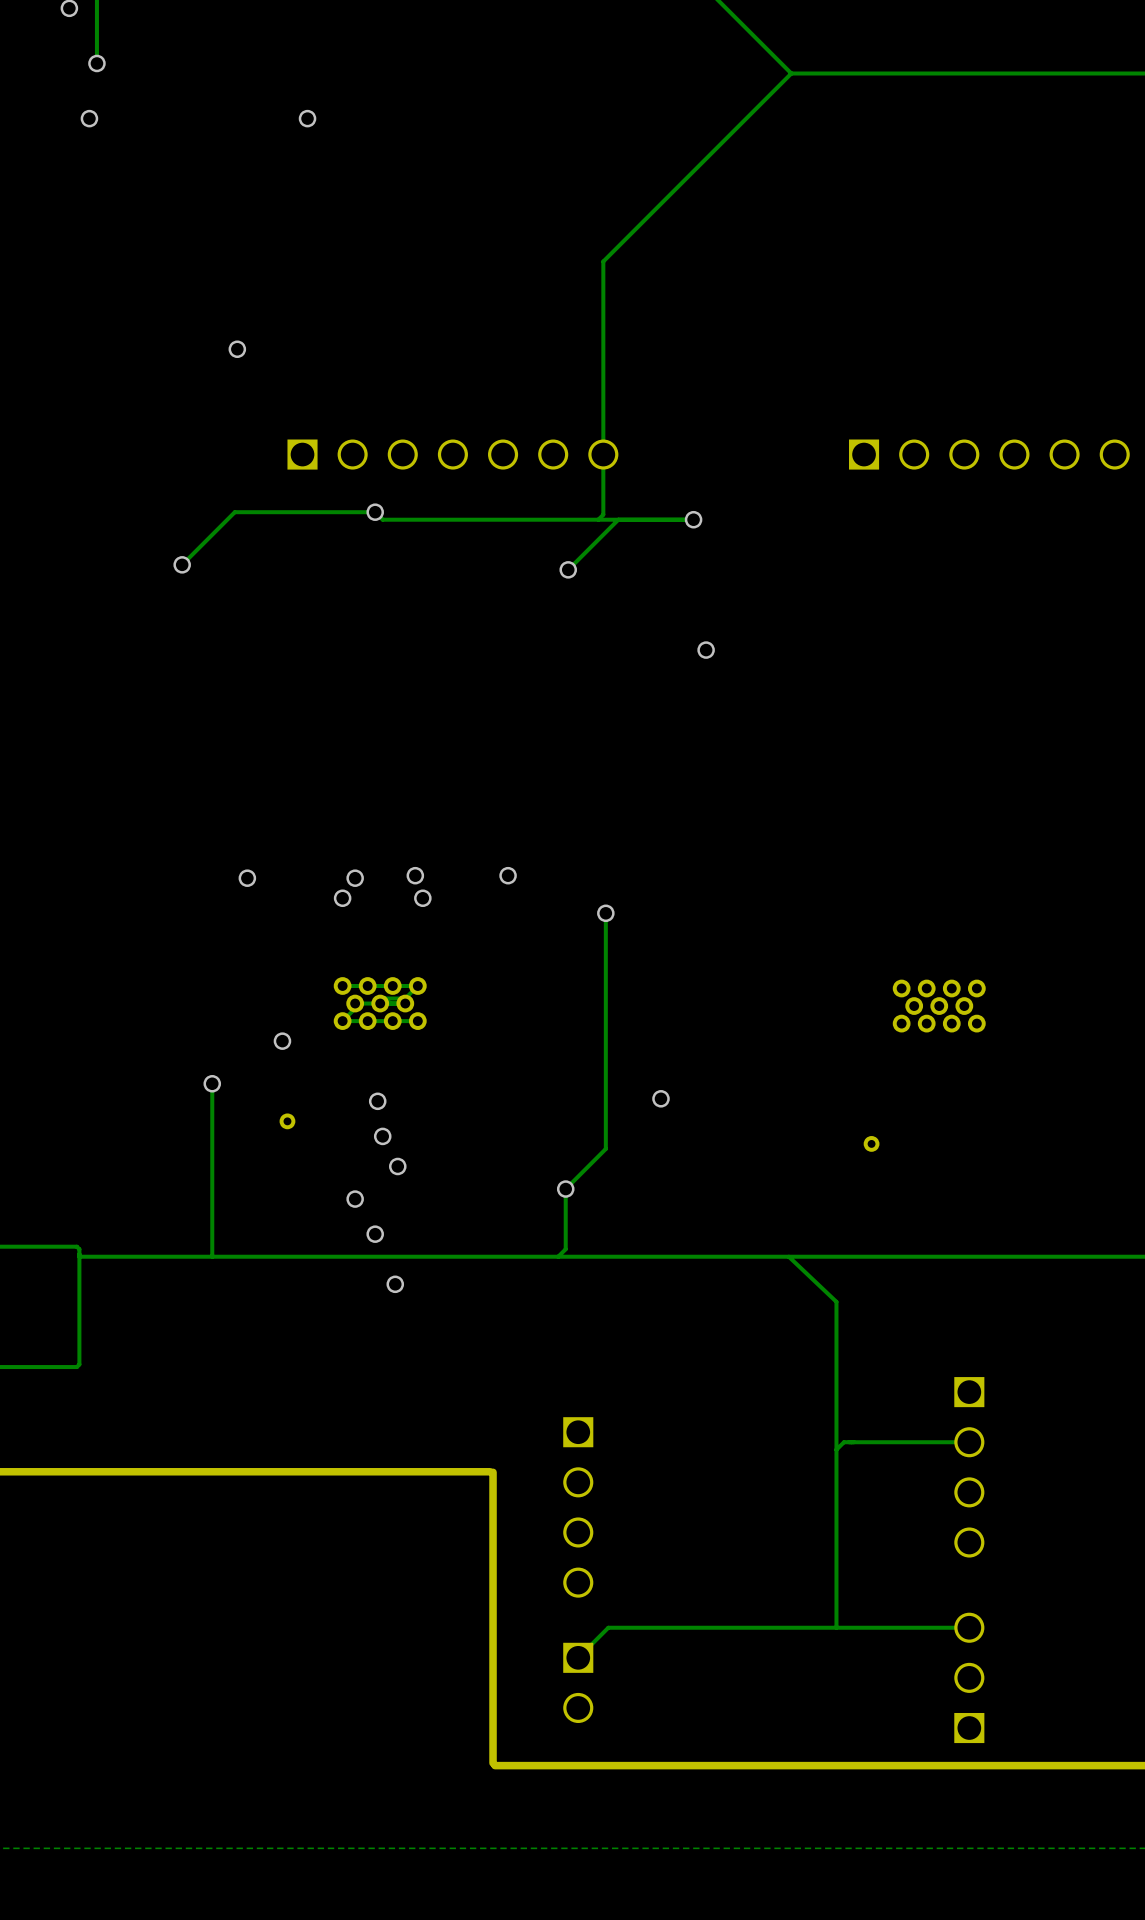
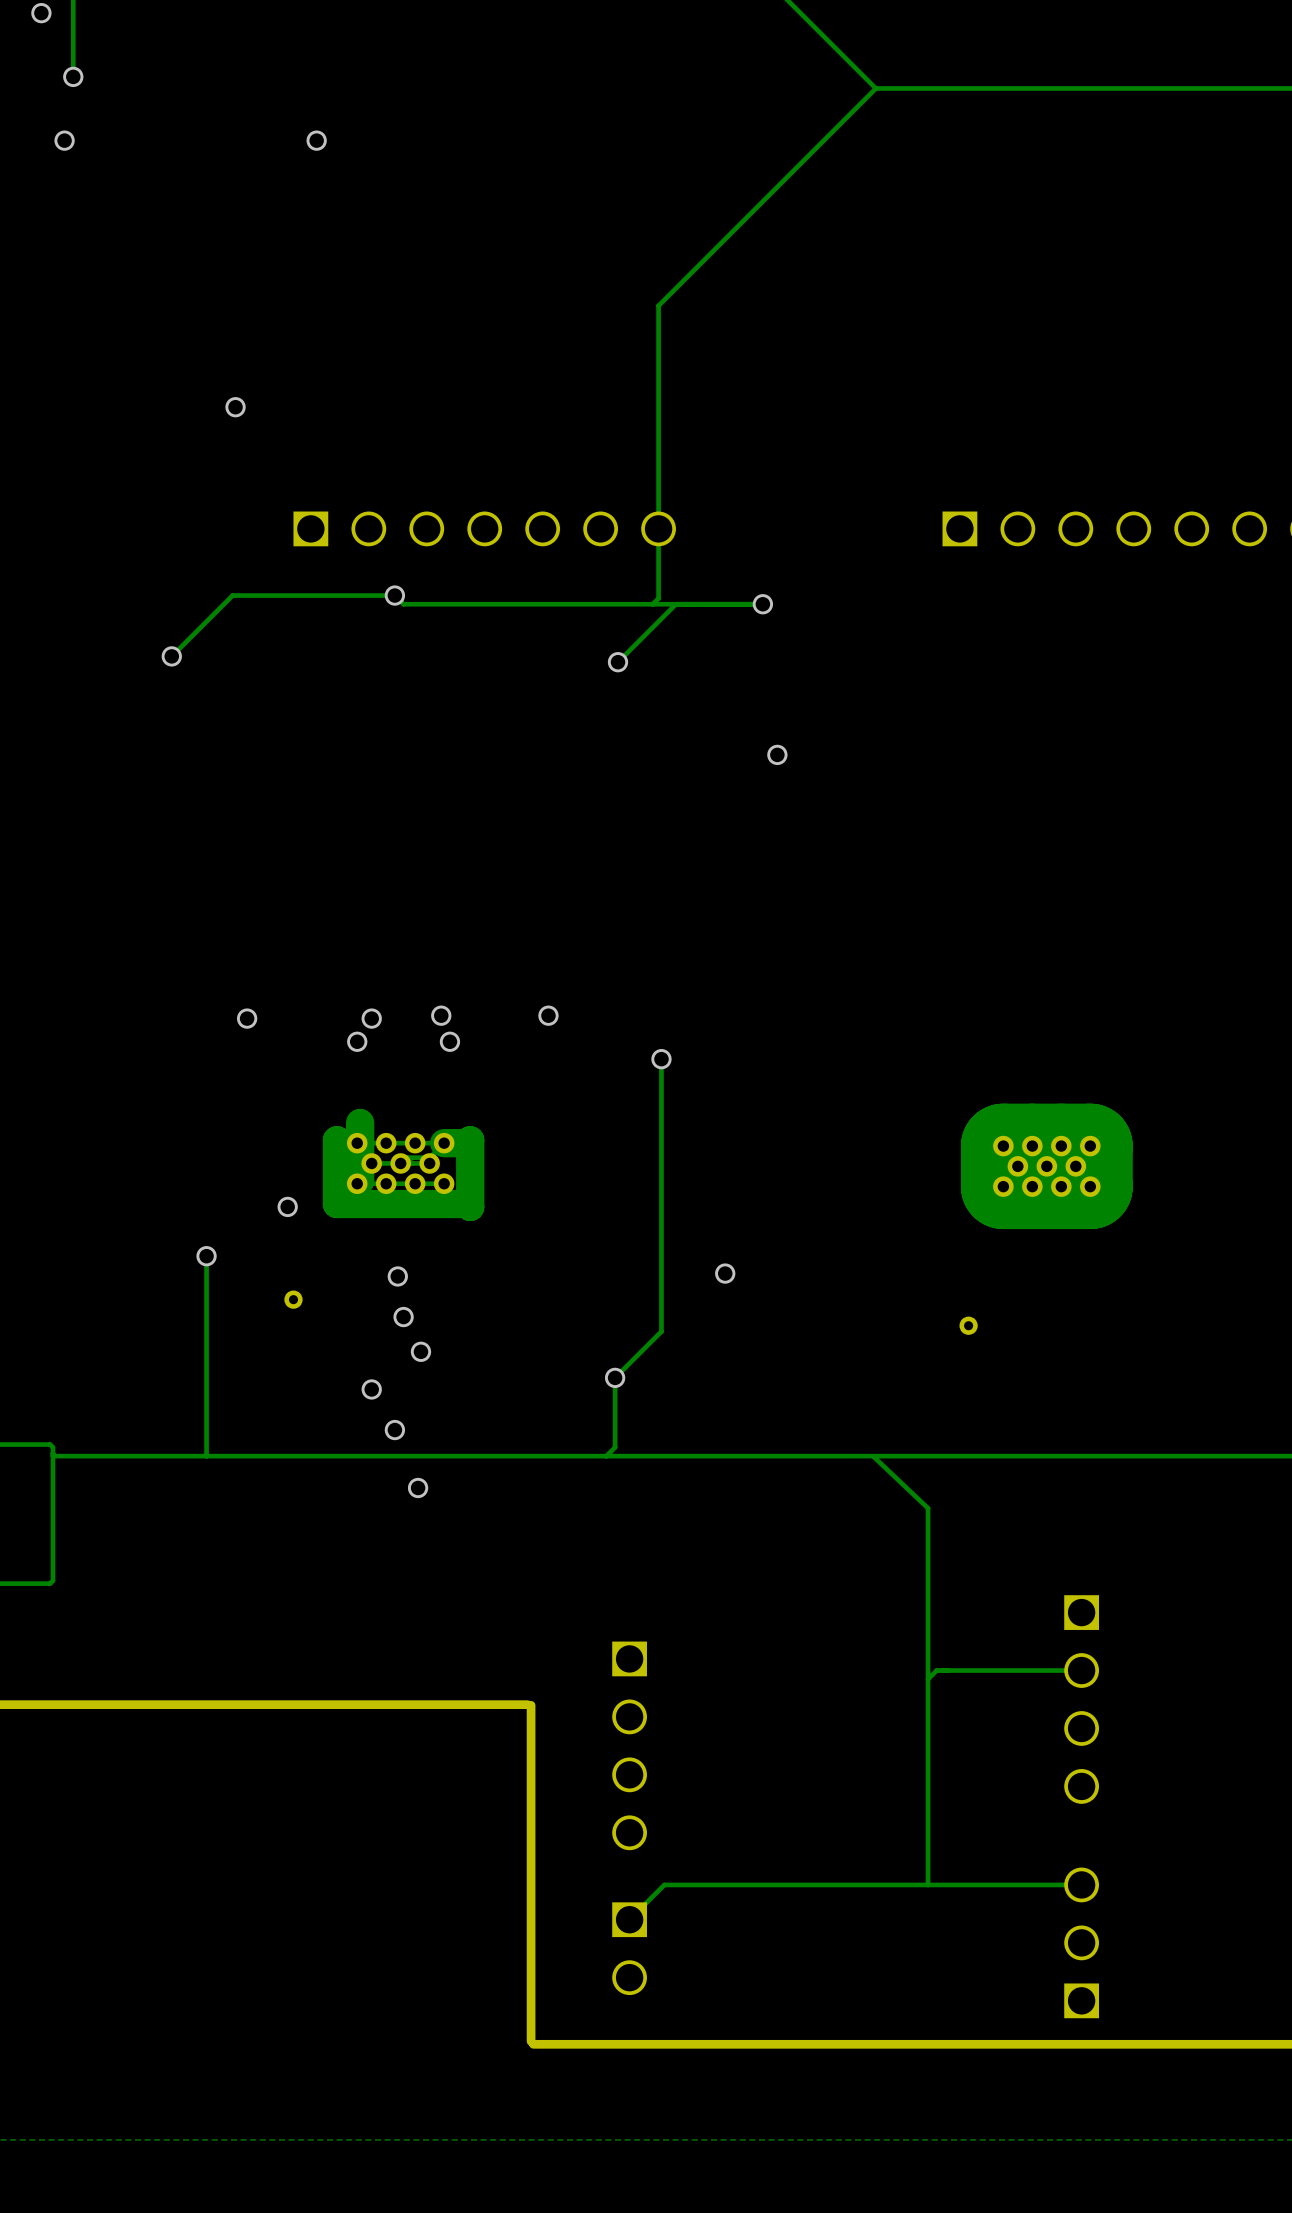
track: none -> (360, 1122) (360, 1180) (357, 1183) (357, 1143) (339, 1143) (336, 1140) (336, 1204) (467, 1204) (470, 1206) (470, 1140) (467, 1143) (444, 1143)
track: none -> (1090, 1146) (1090, 1186) (1003, 1186) (1003, 1146) (1090, 1146)

